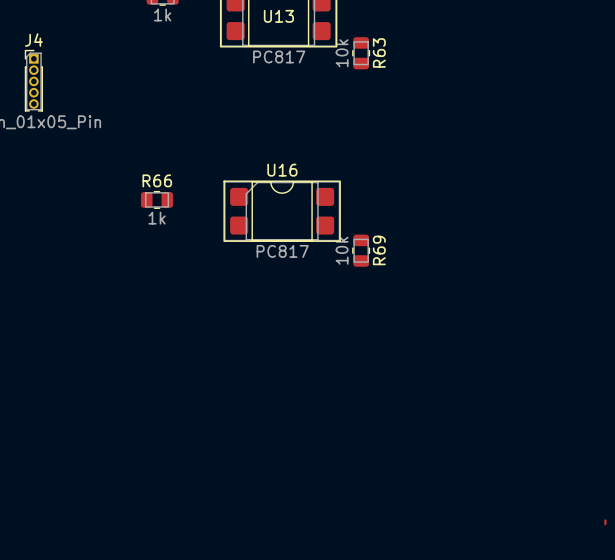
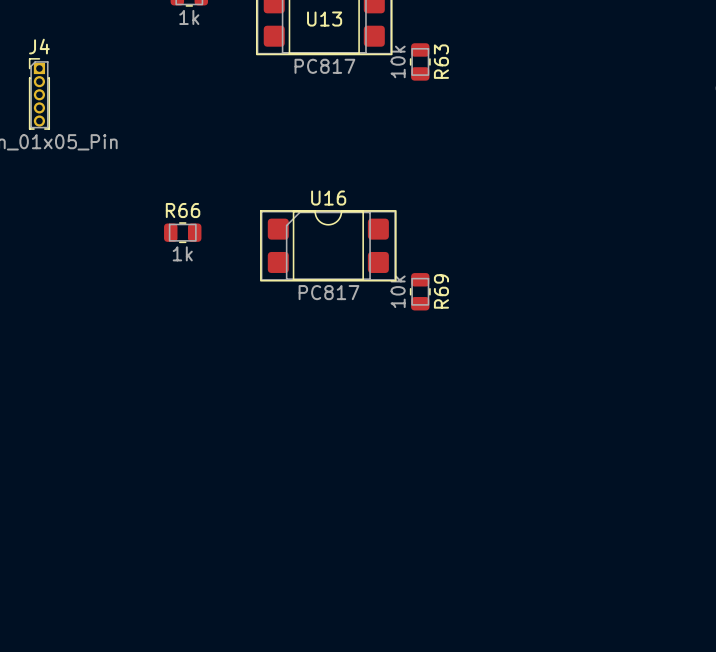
track: (605, 520) (605, 524) -> none

